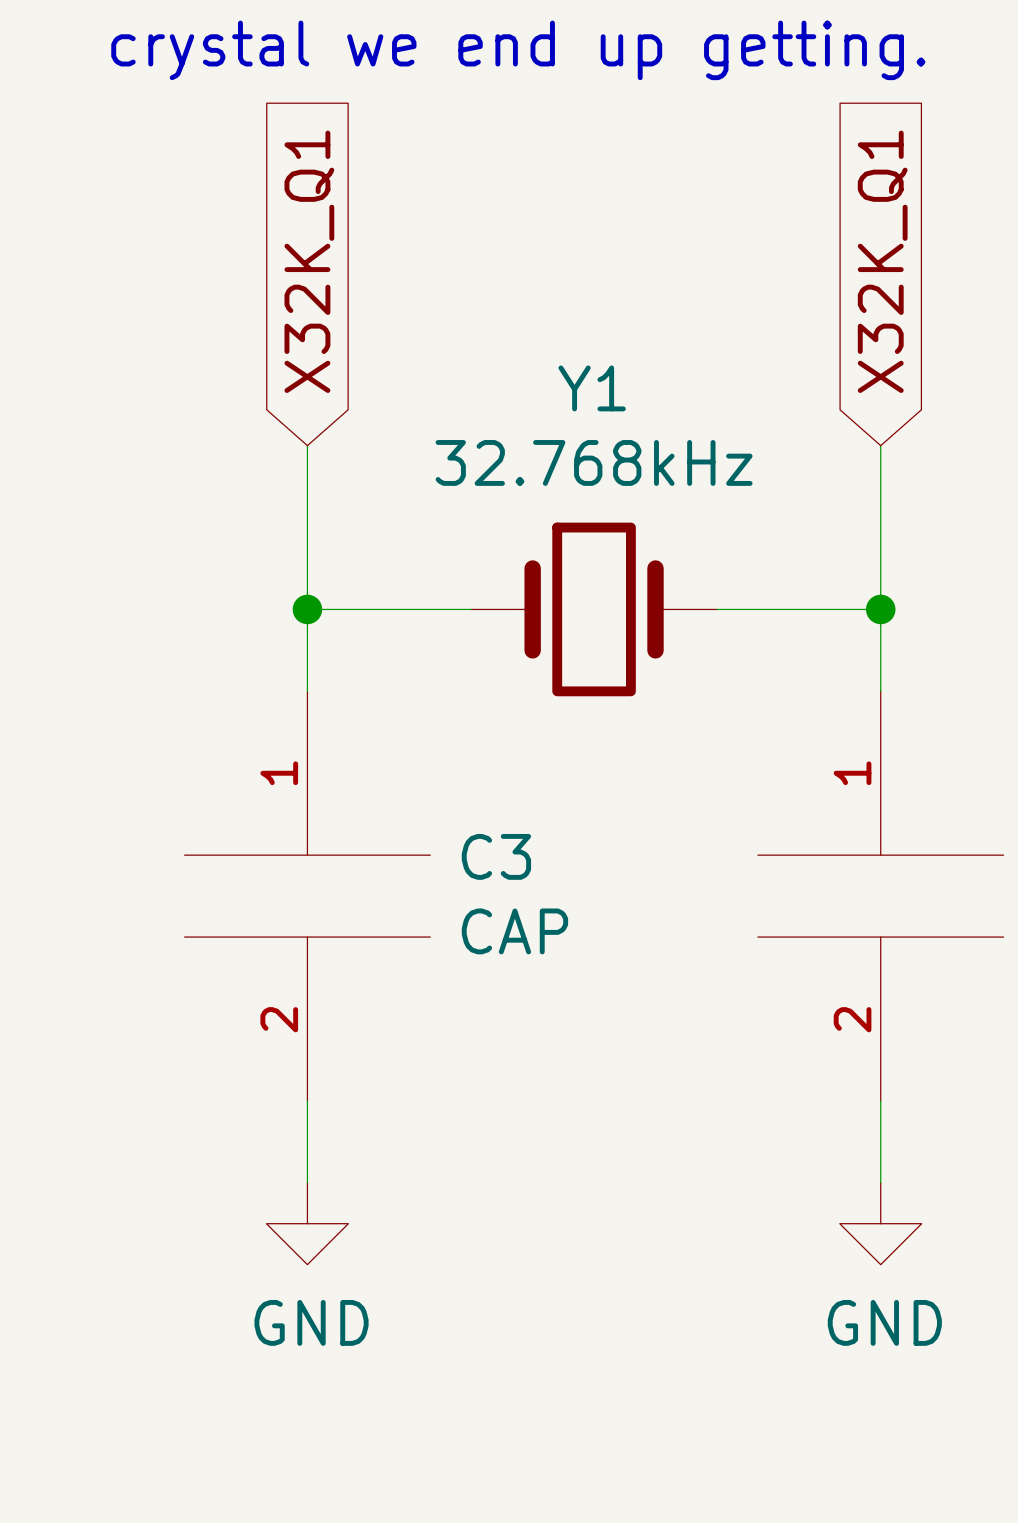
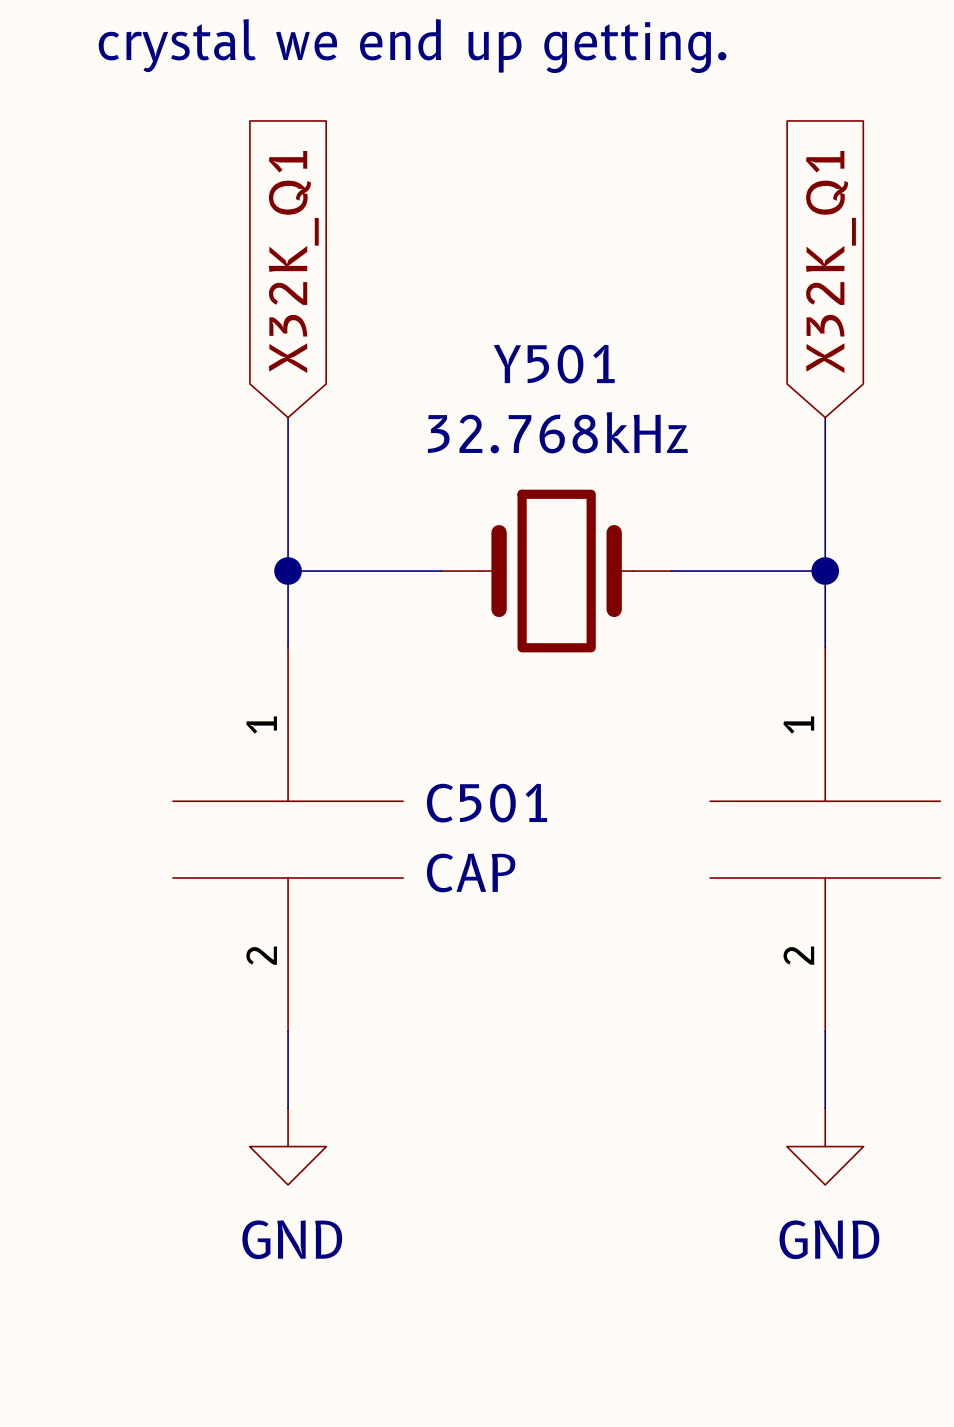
Y1 name: Y1 (592, 388) -> Y501 (554, 364)
C3 name: C3 (496, 856) -> C501 (486, 803)

